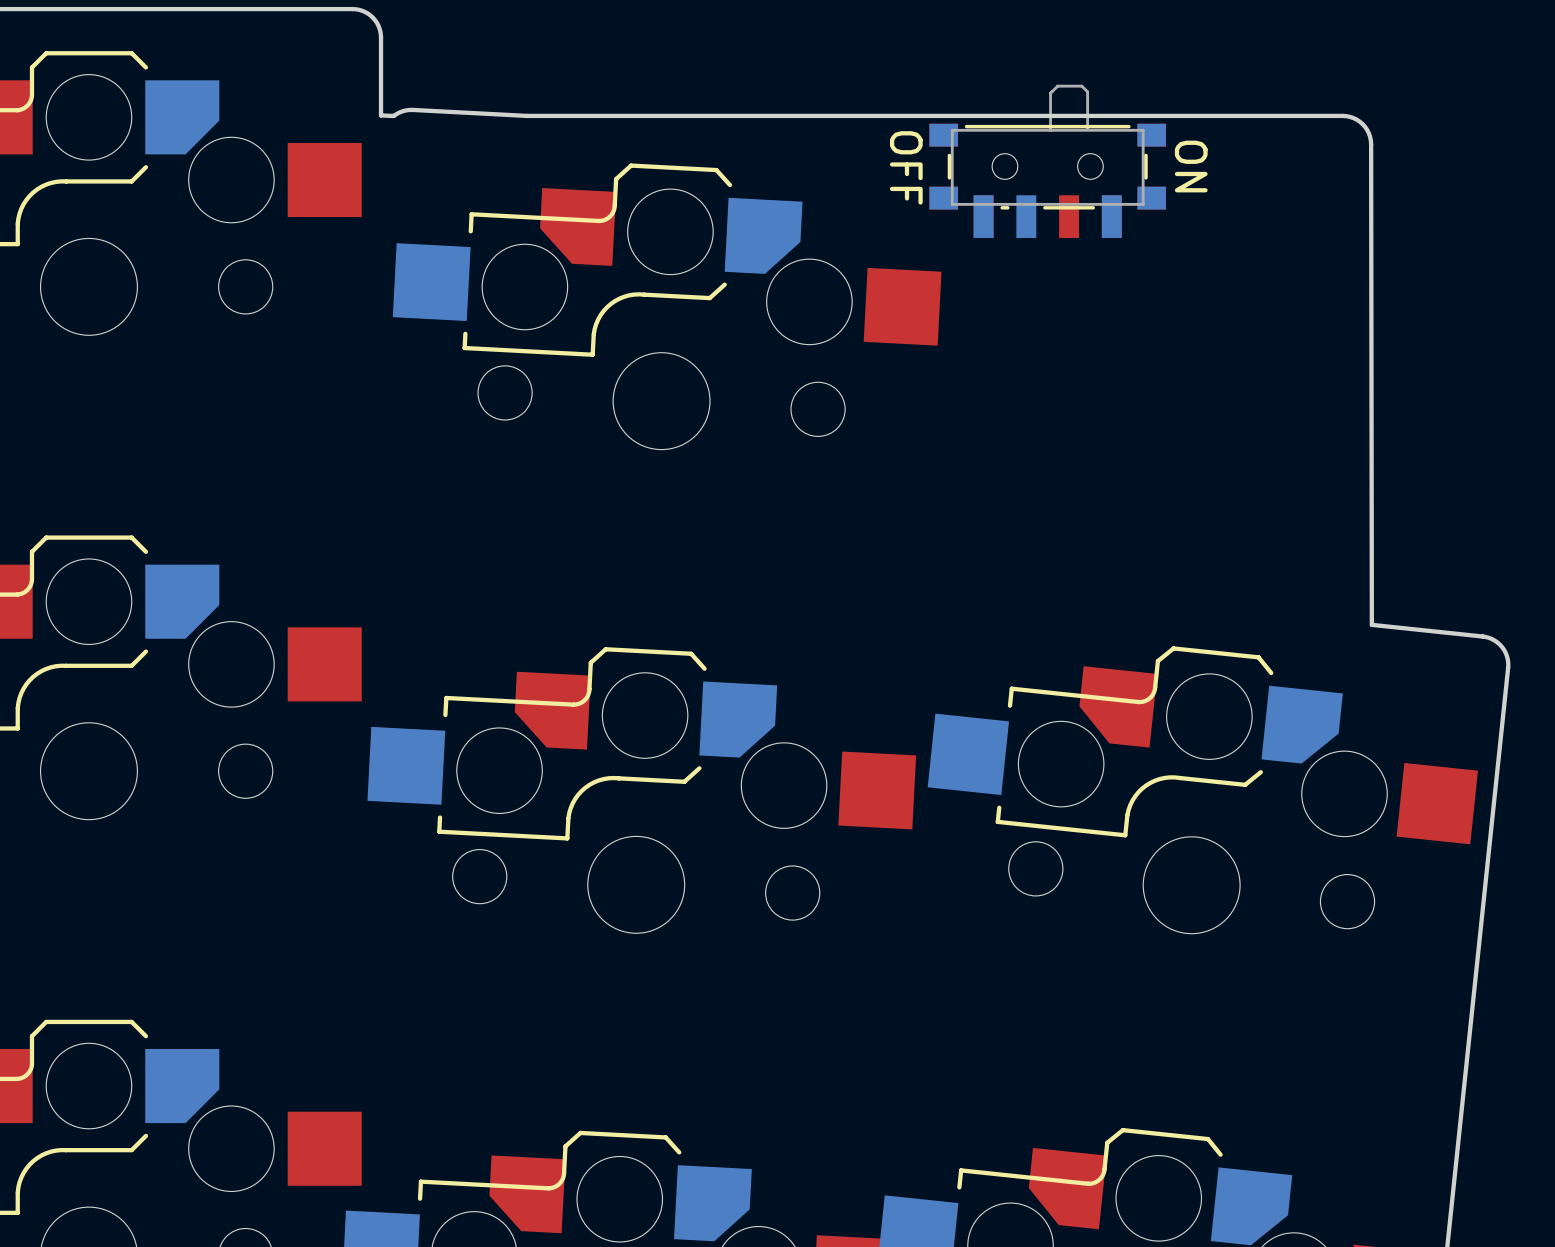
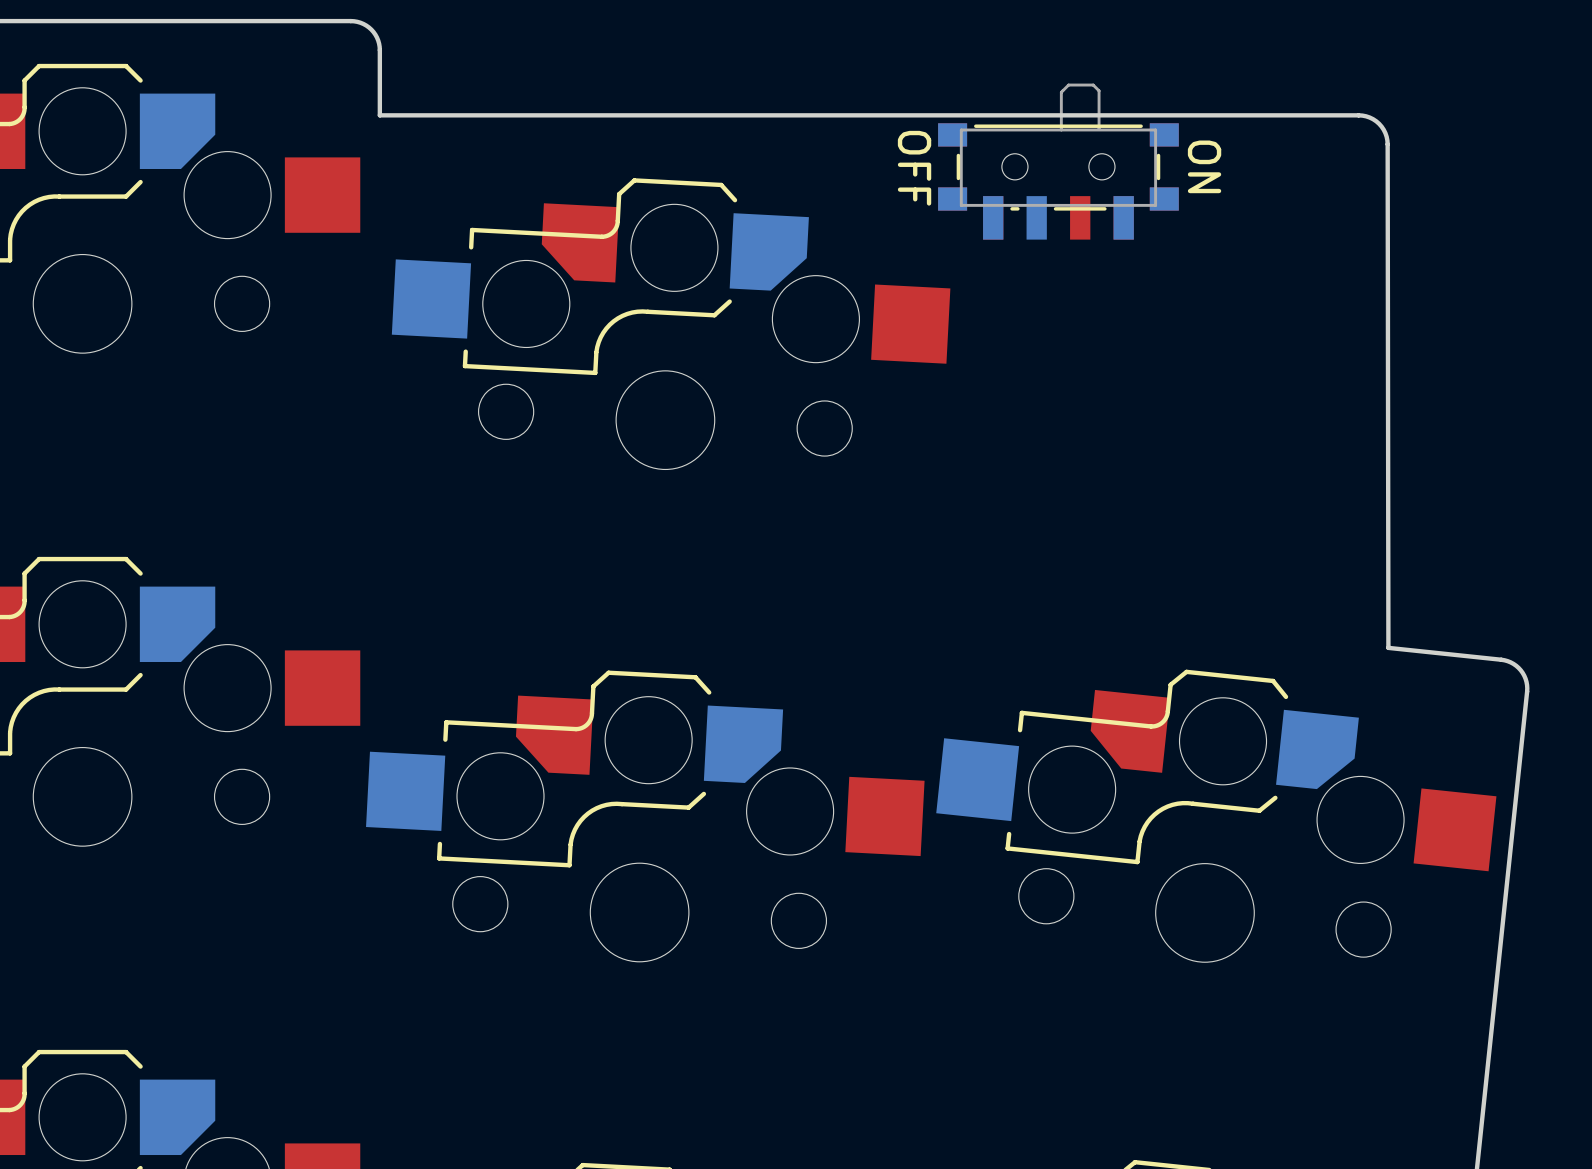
board edge: (381, 101) (381, 115) (391, 115) (412, 109) (527, 115) (1342, 115) (1353, 118) (1362, 124) (1368, 133) (1371, 144) -> (379, 115) (1358, 115) (1373, 119) (1383, 129) (1387, 140) (1387, 158)
part position: (1047, 161) -> (1058, 161)

